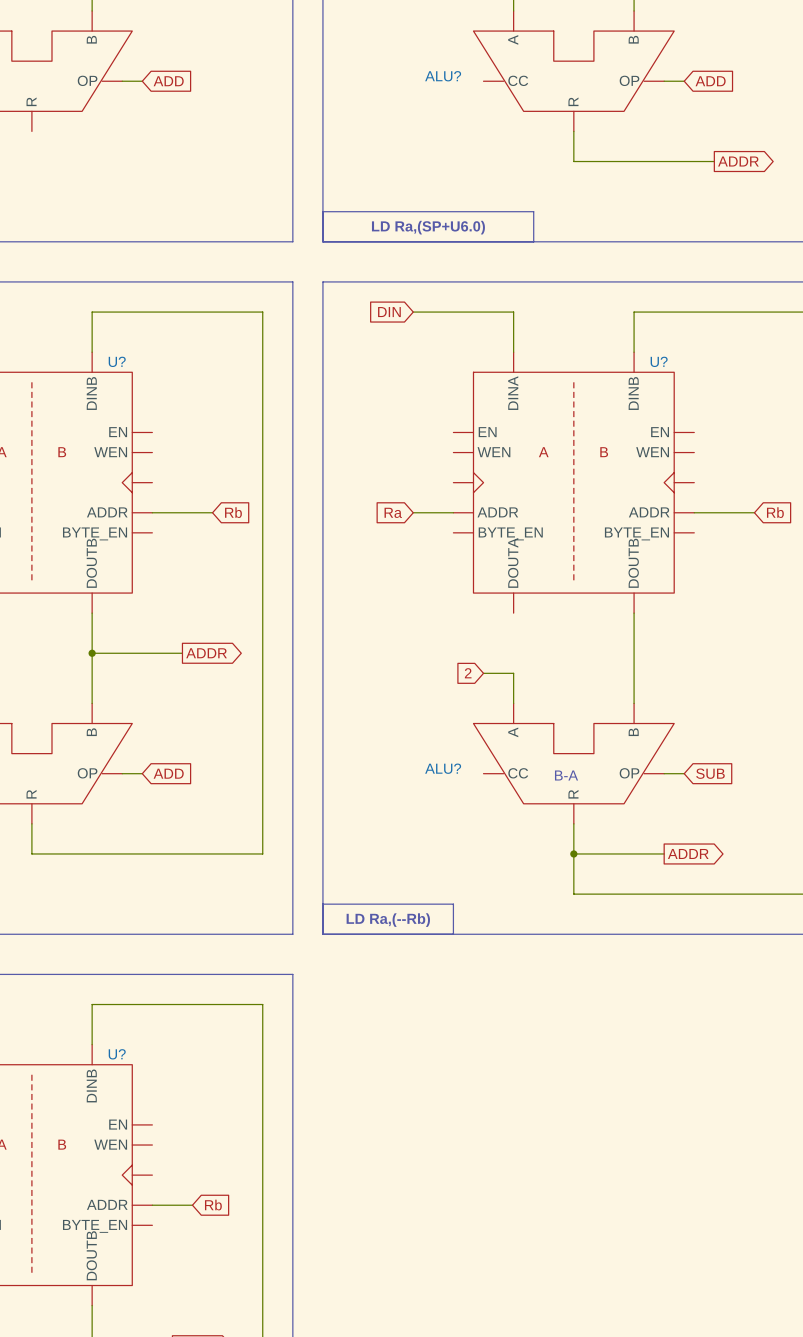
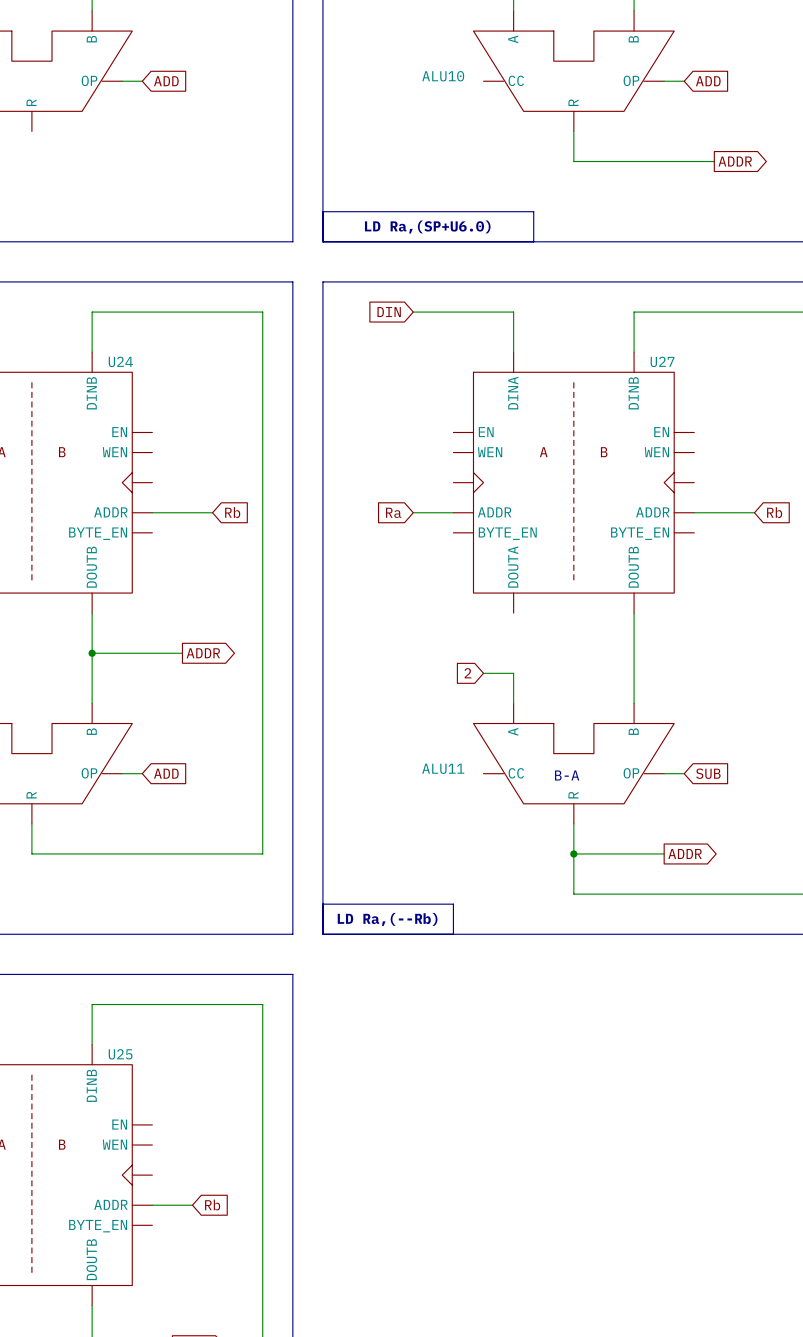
ALU? name: ALU? (443, 76) -> ALU10 (443, 76)
U? name: U? (117, 361) -> U24 (120, 361)
U? name: U? (659, 361) -> U27 (662, 361)
ALU? name: ALU? (443, 768) -> ALU11 (443, 768)
U? name: U? (117, 1054) -> U25 (120, 1054)

